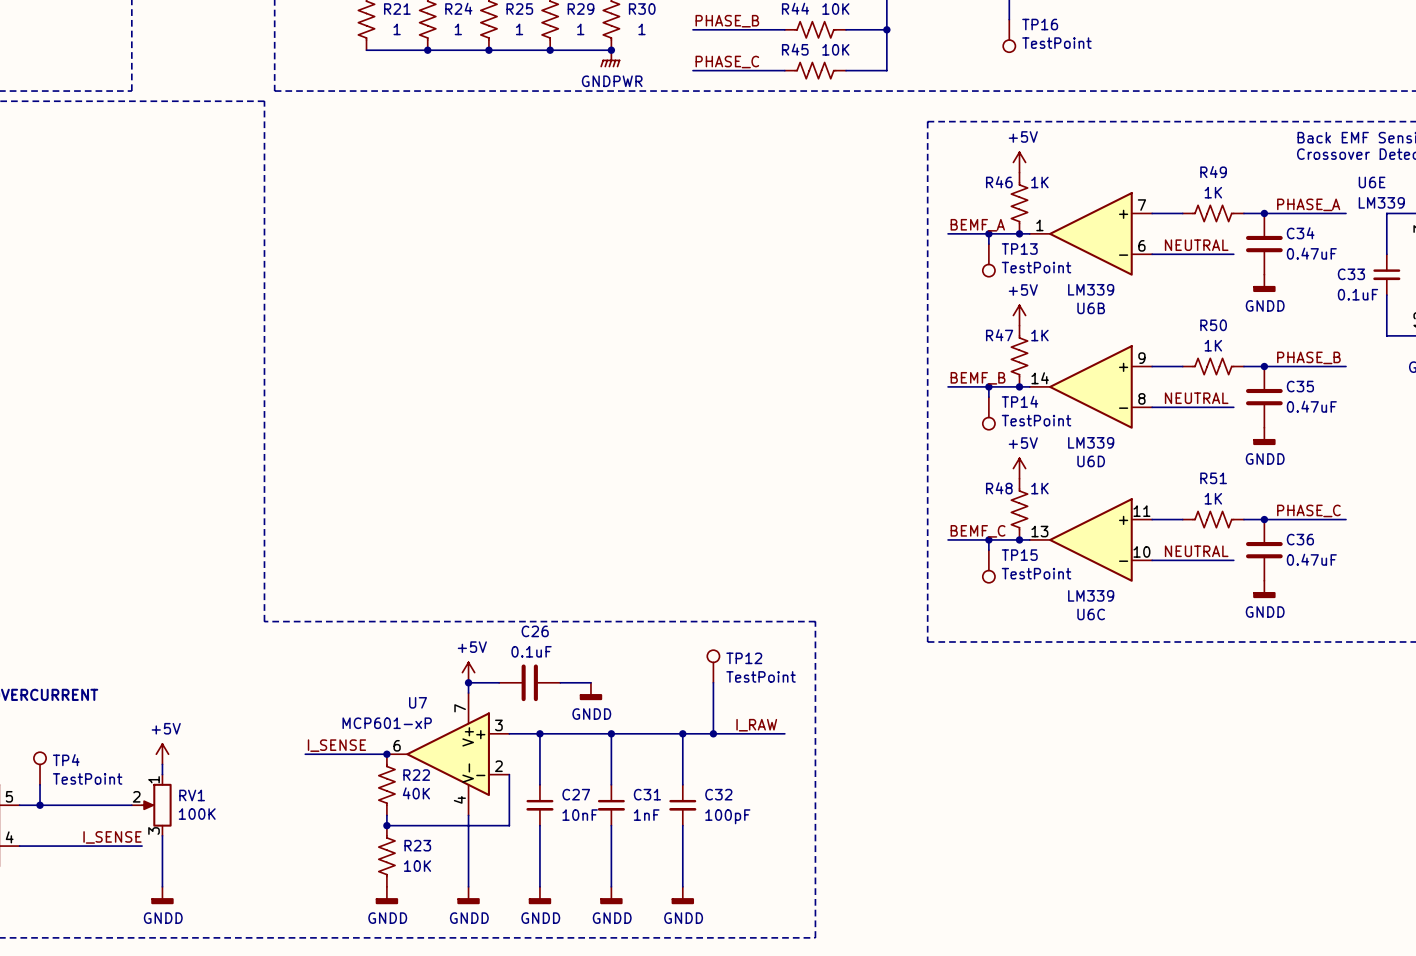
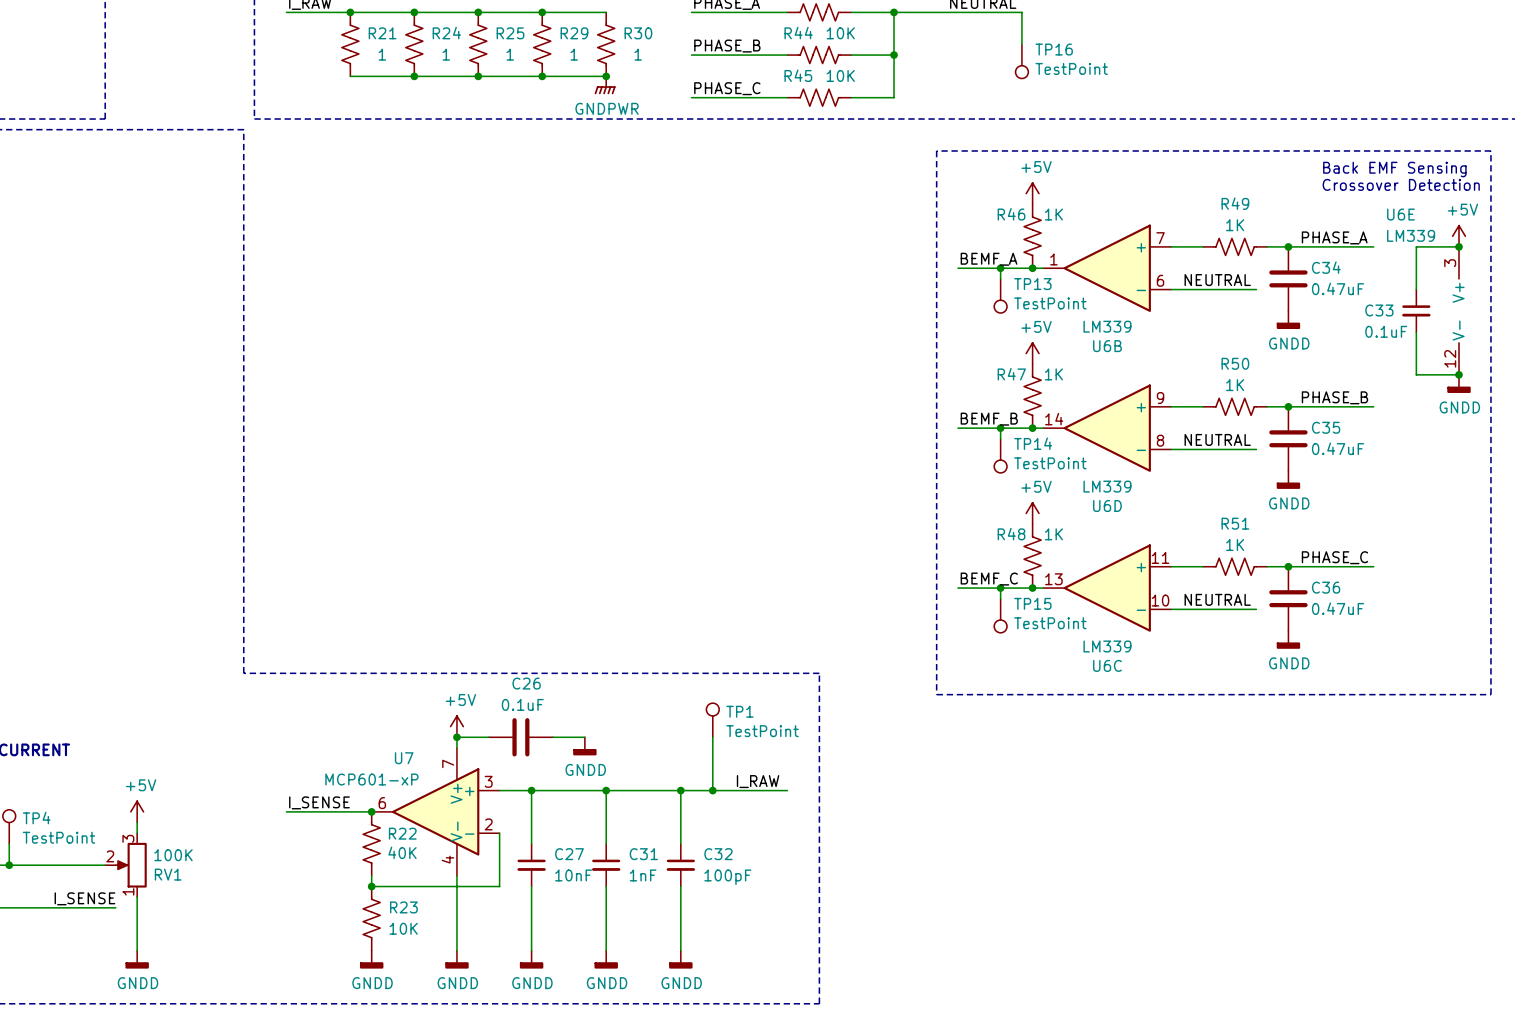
TP12 name: TP12 (744, 658) -> TP1 (739, 711)
RV1 flip: as is (156, 805) -> up-down (131, 865)

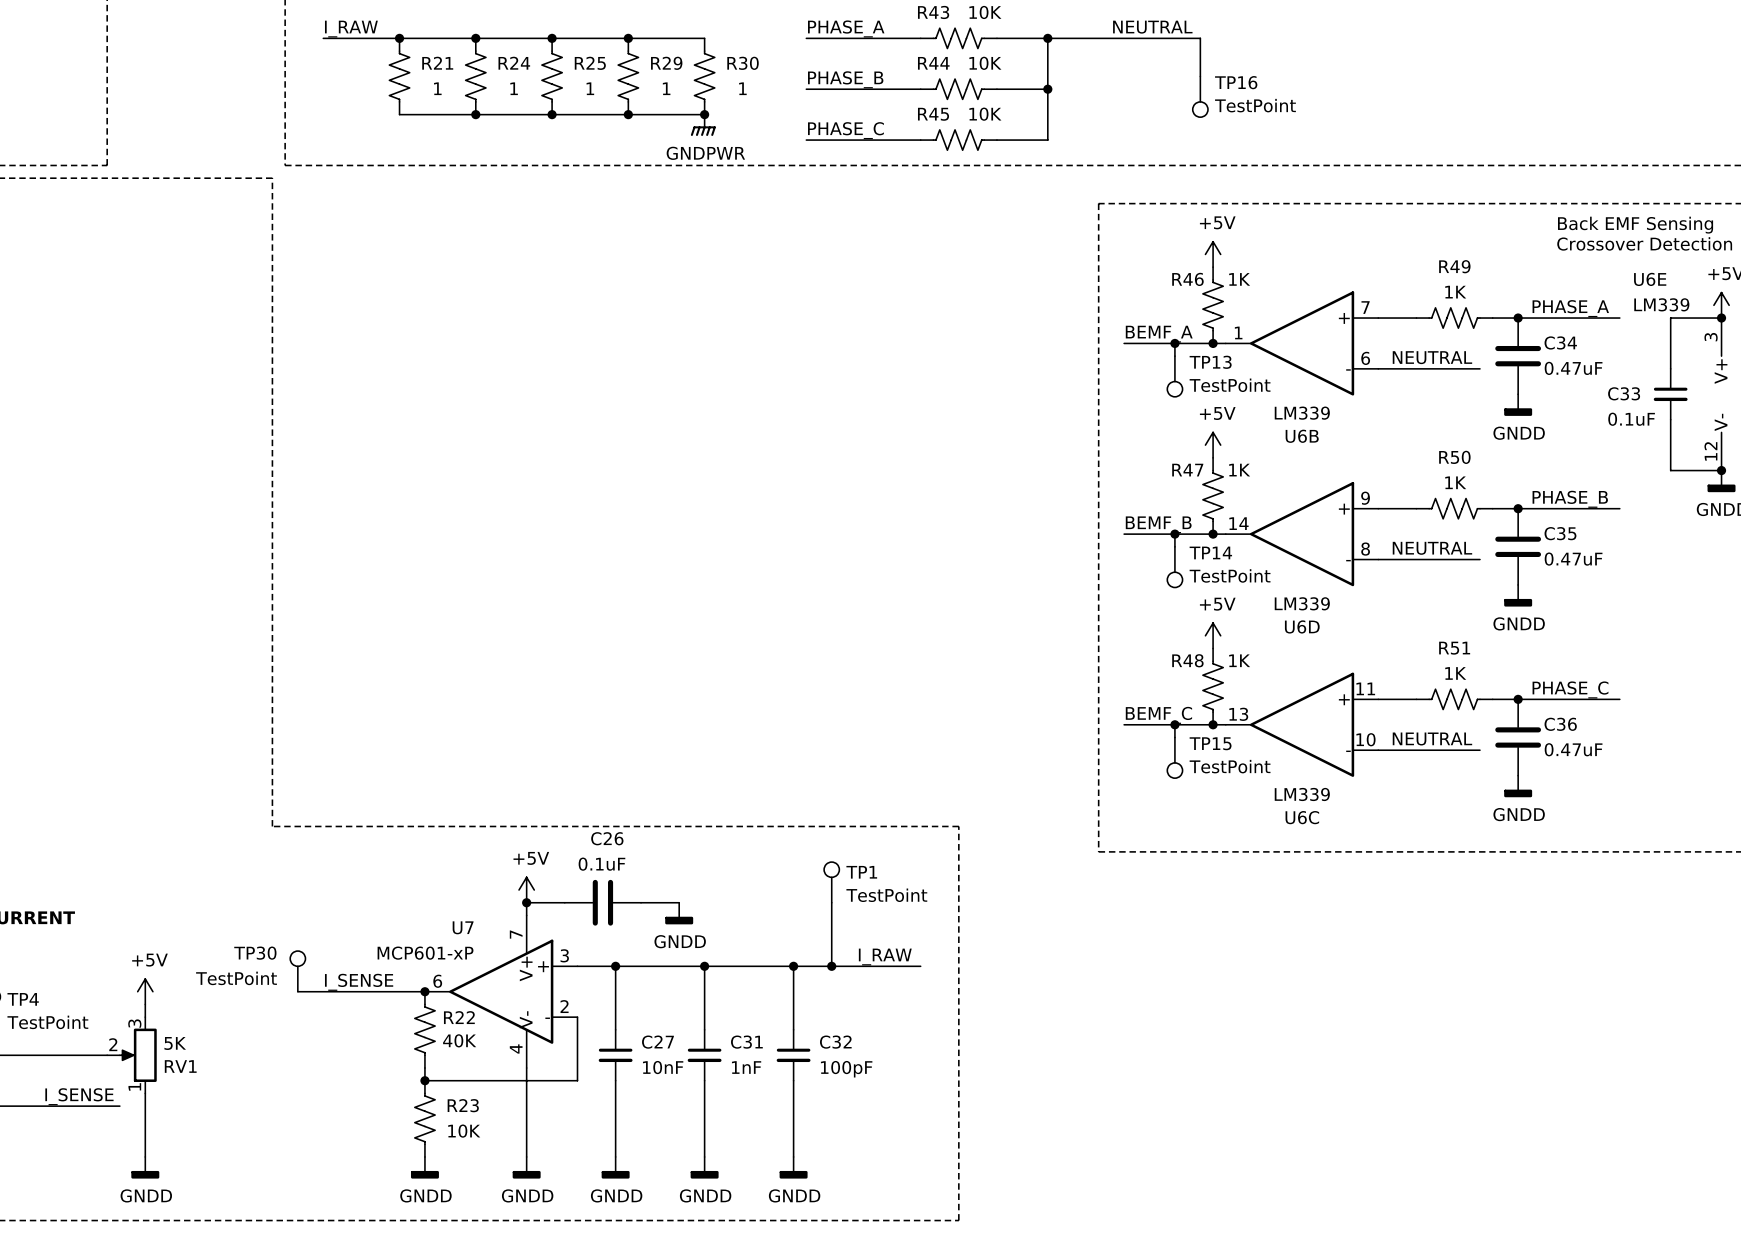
TP30: none -> TestPoint (297, 971)
wire: none -> (297, 991) (323, 991)
RV1 value: 100K (173, 855) -> 5K (175, 1043)

